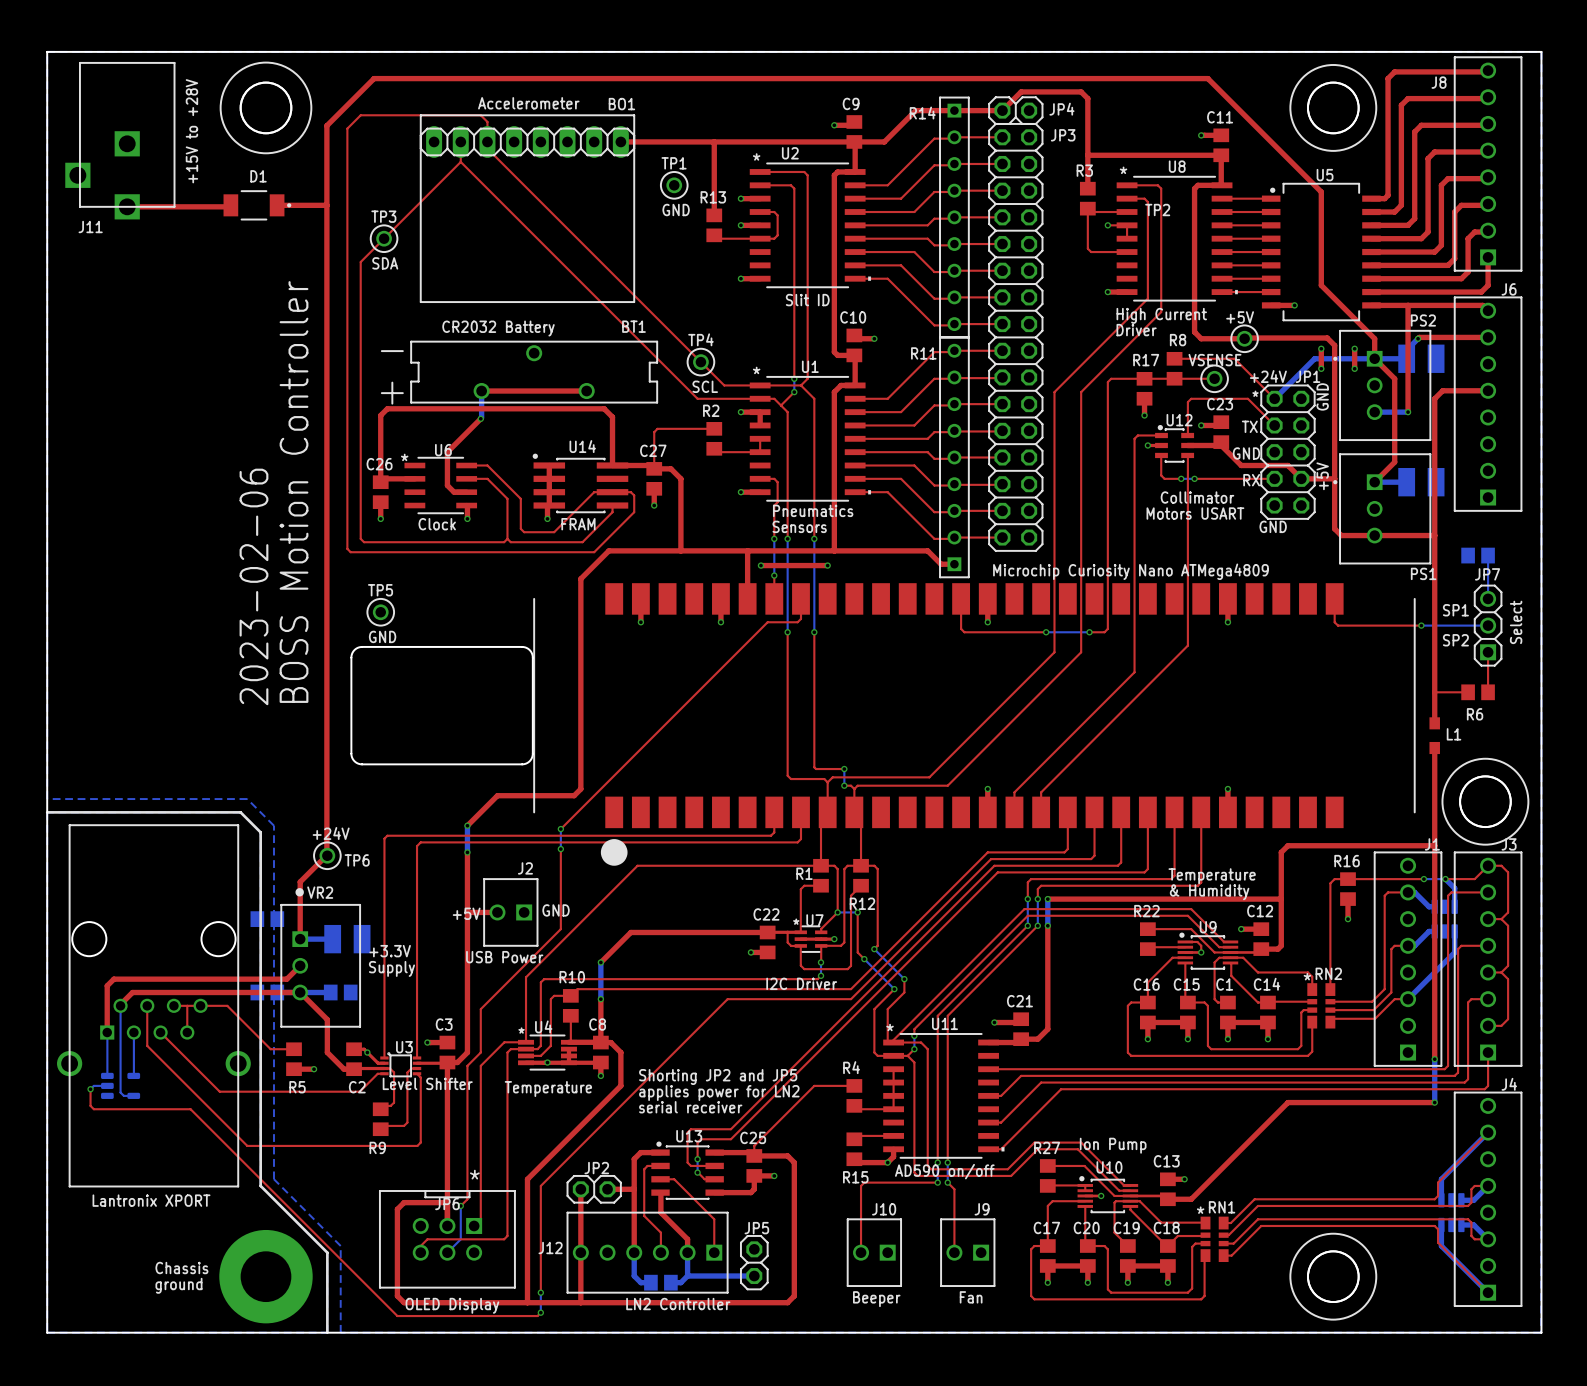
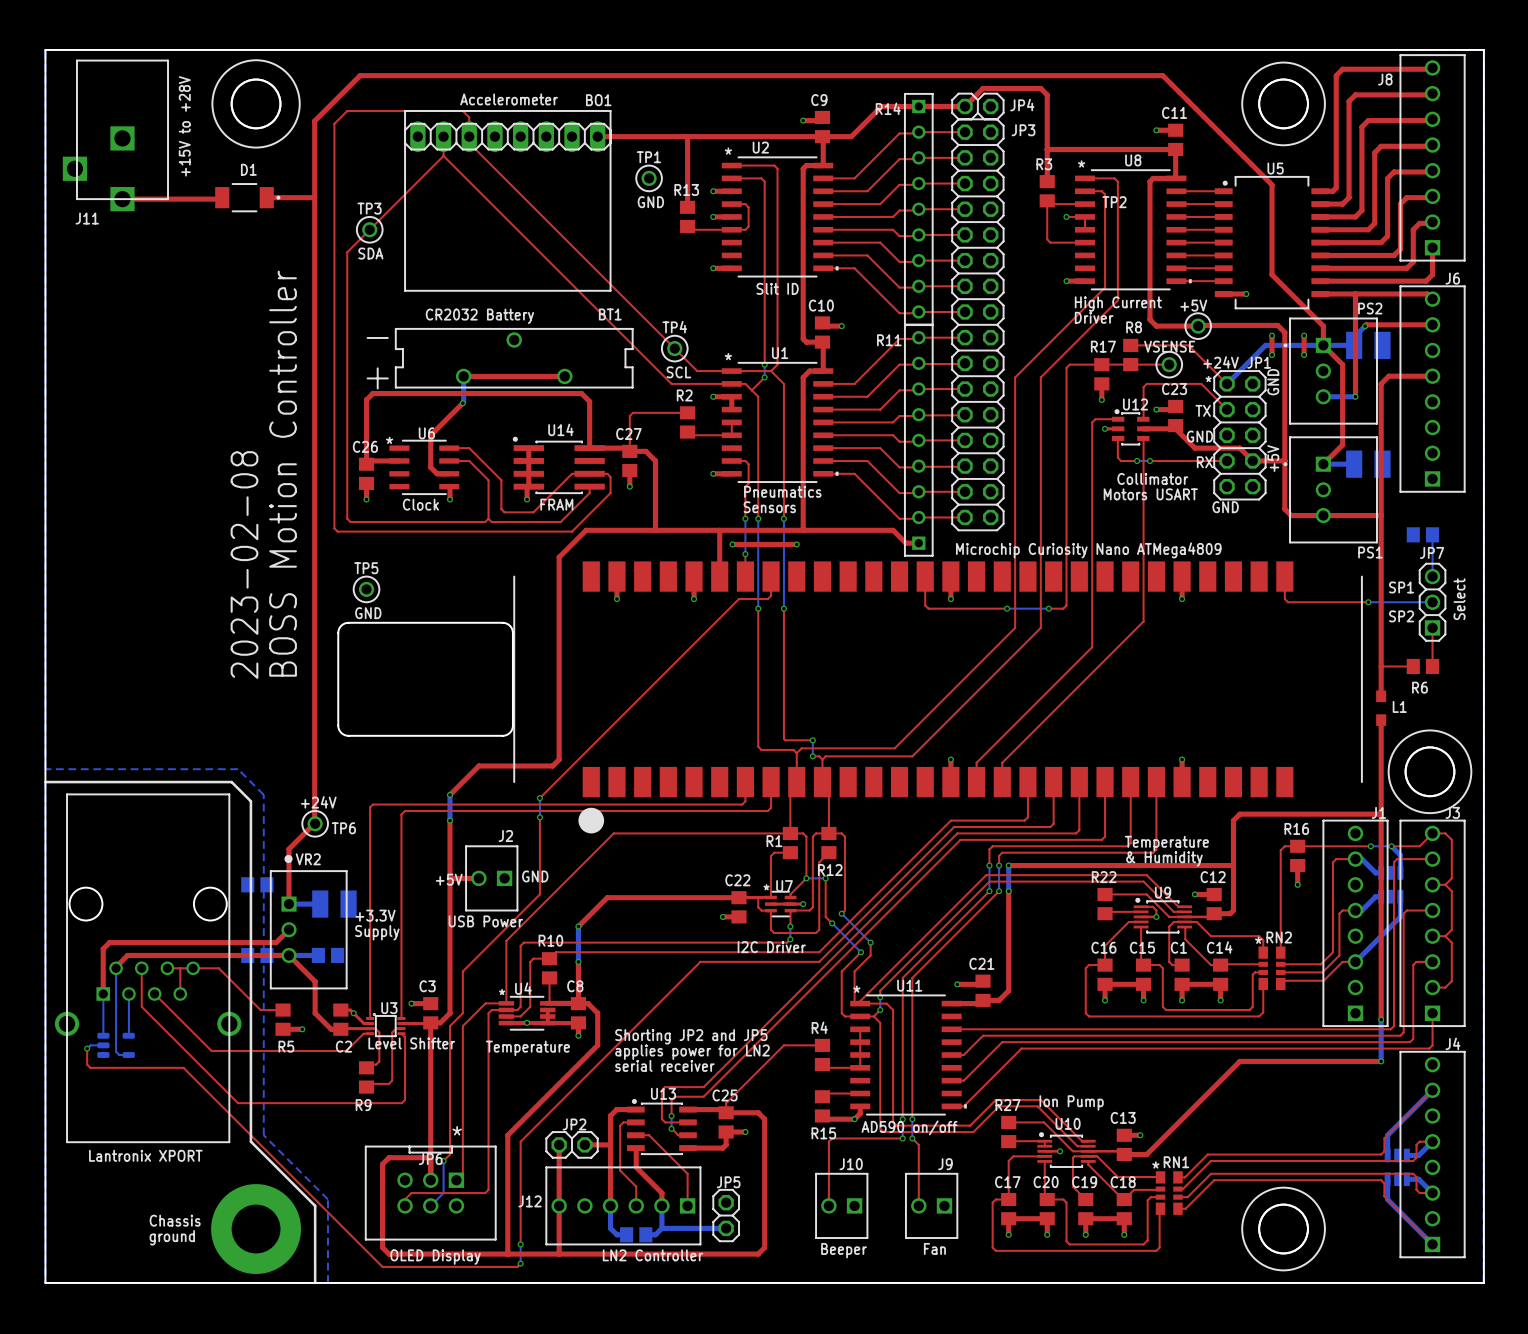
text: 2023-02-06 (253, 586) -> 2023-02-08 (244, 565)

